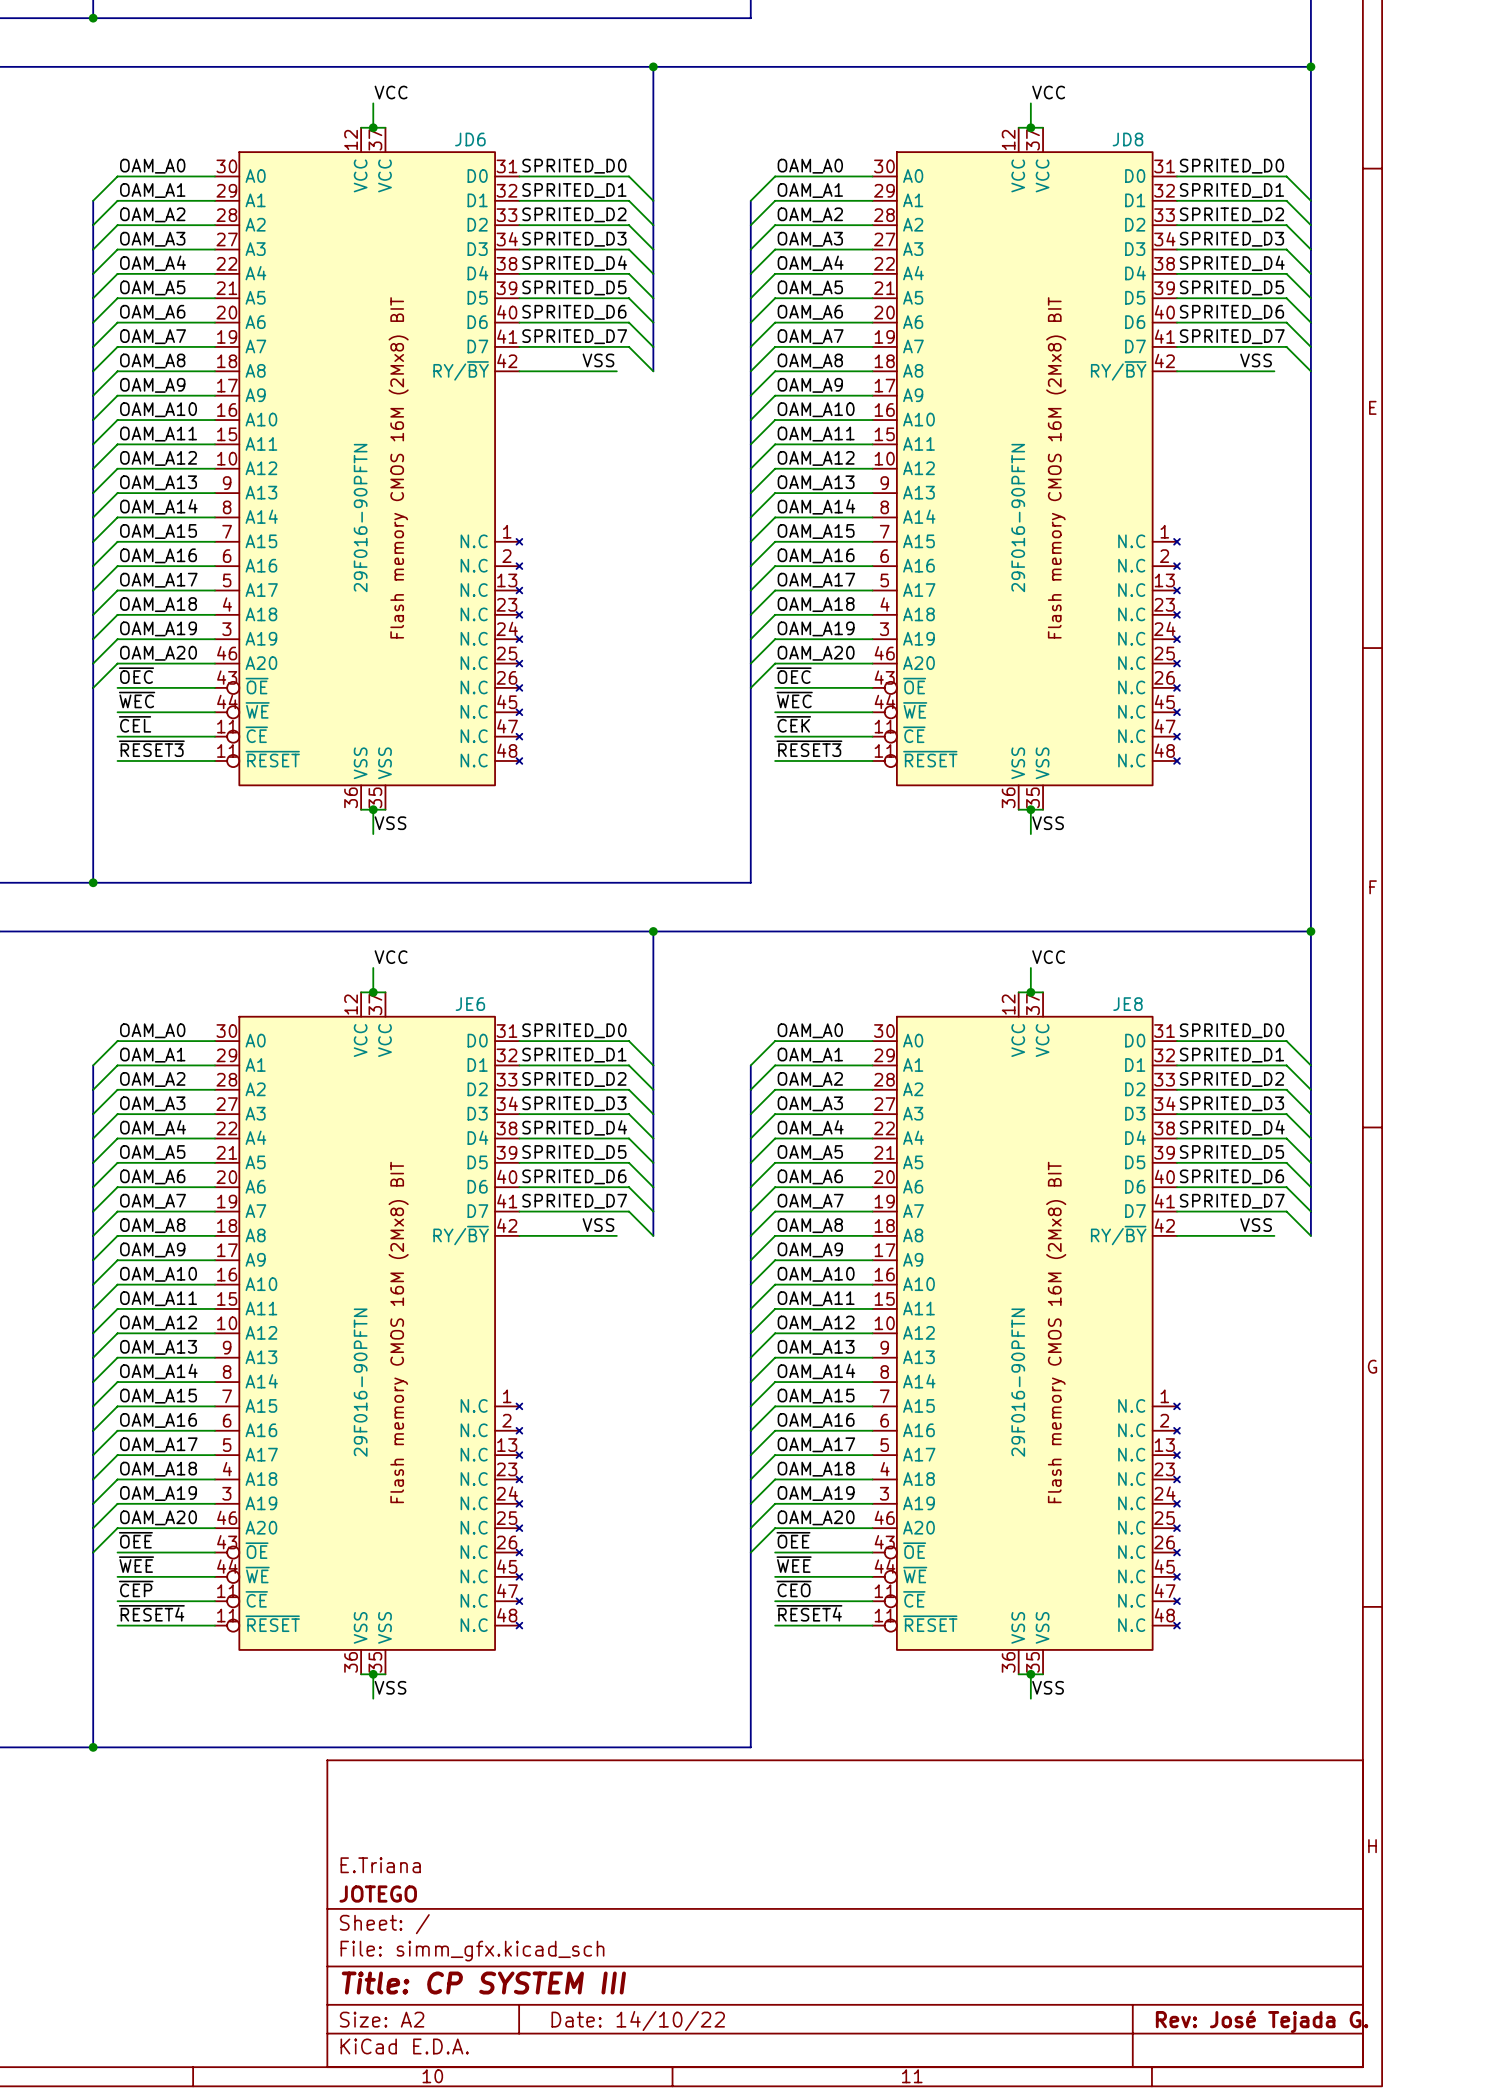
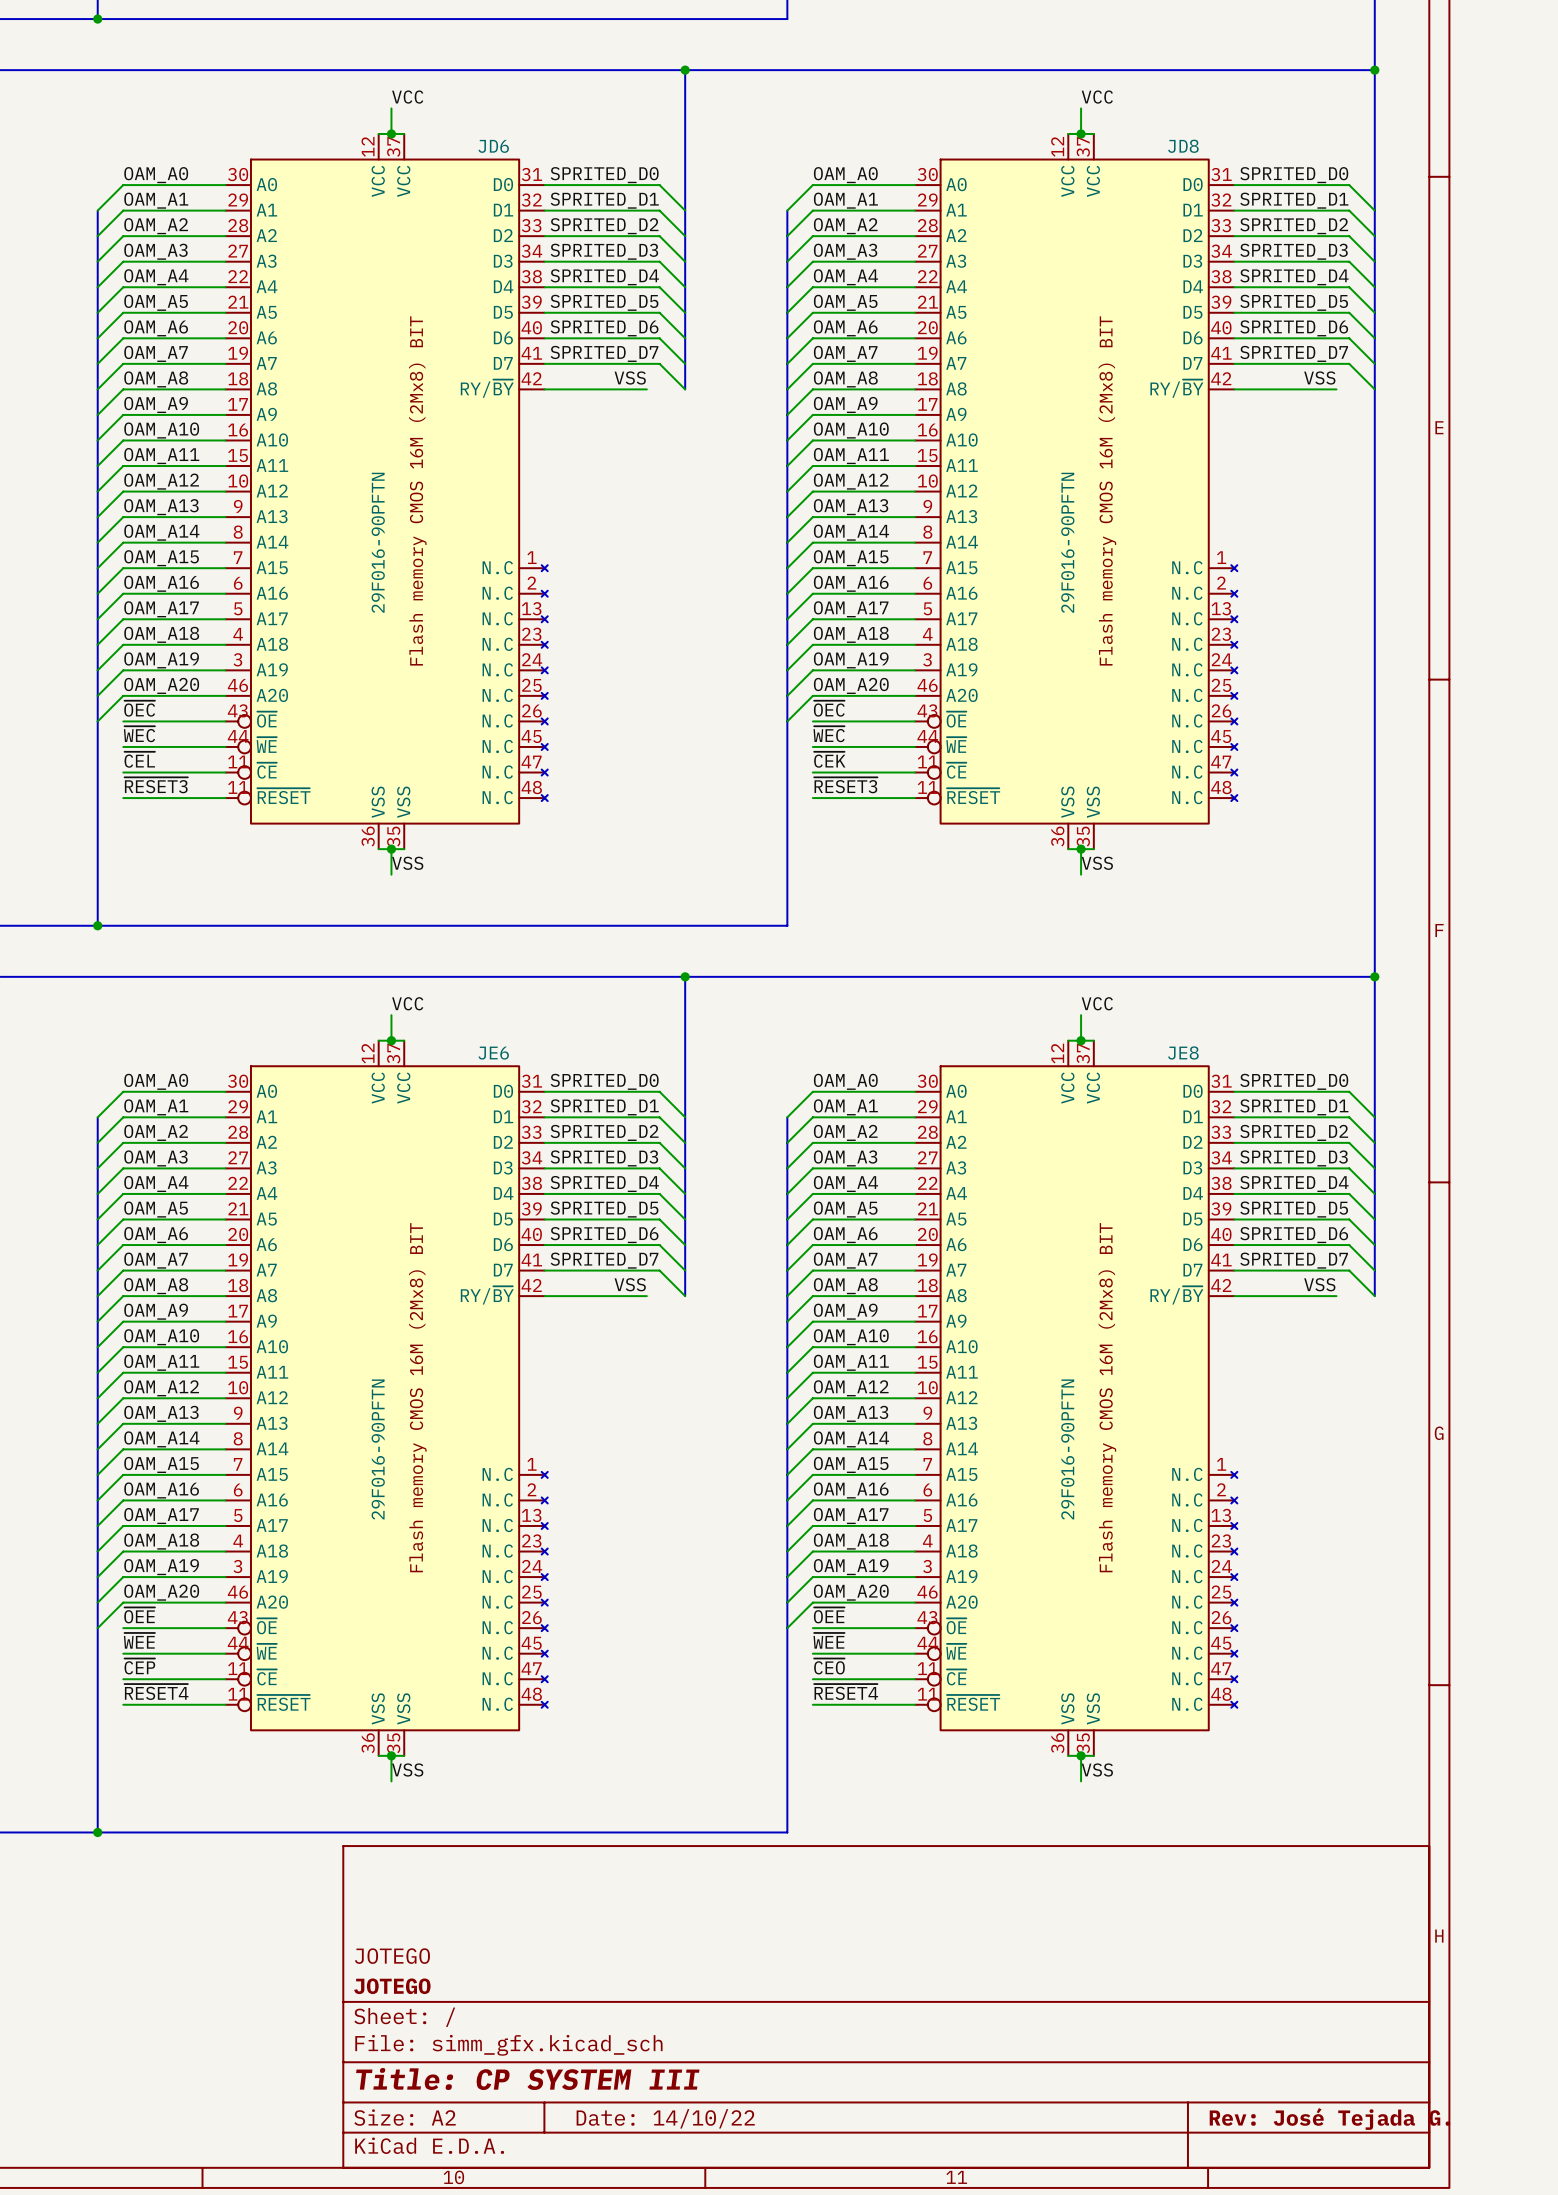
title block: E.Triana (380, 1865) -> JOTEGO (392, 1956)

